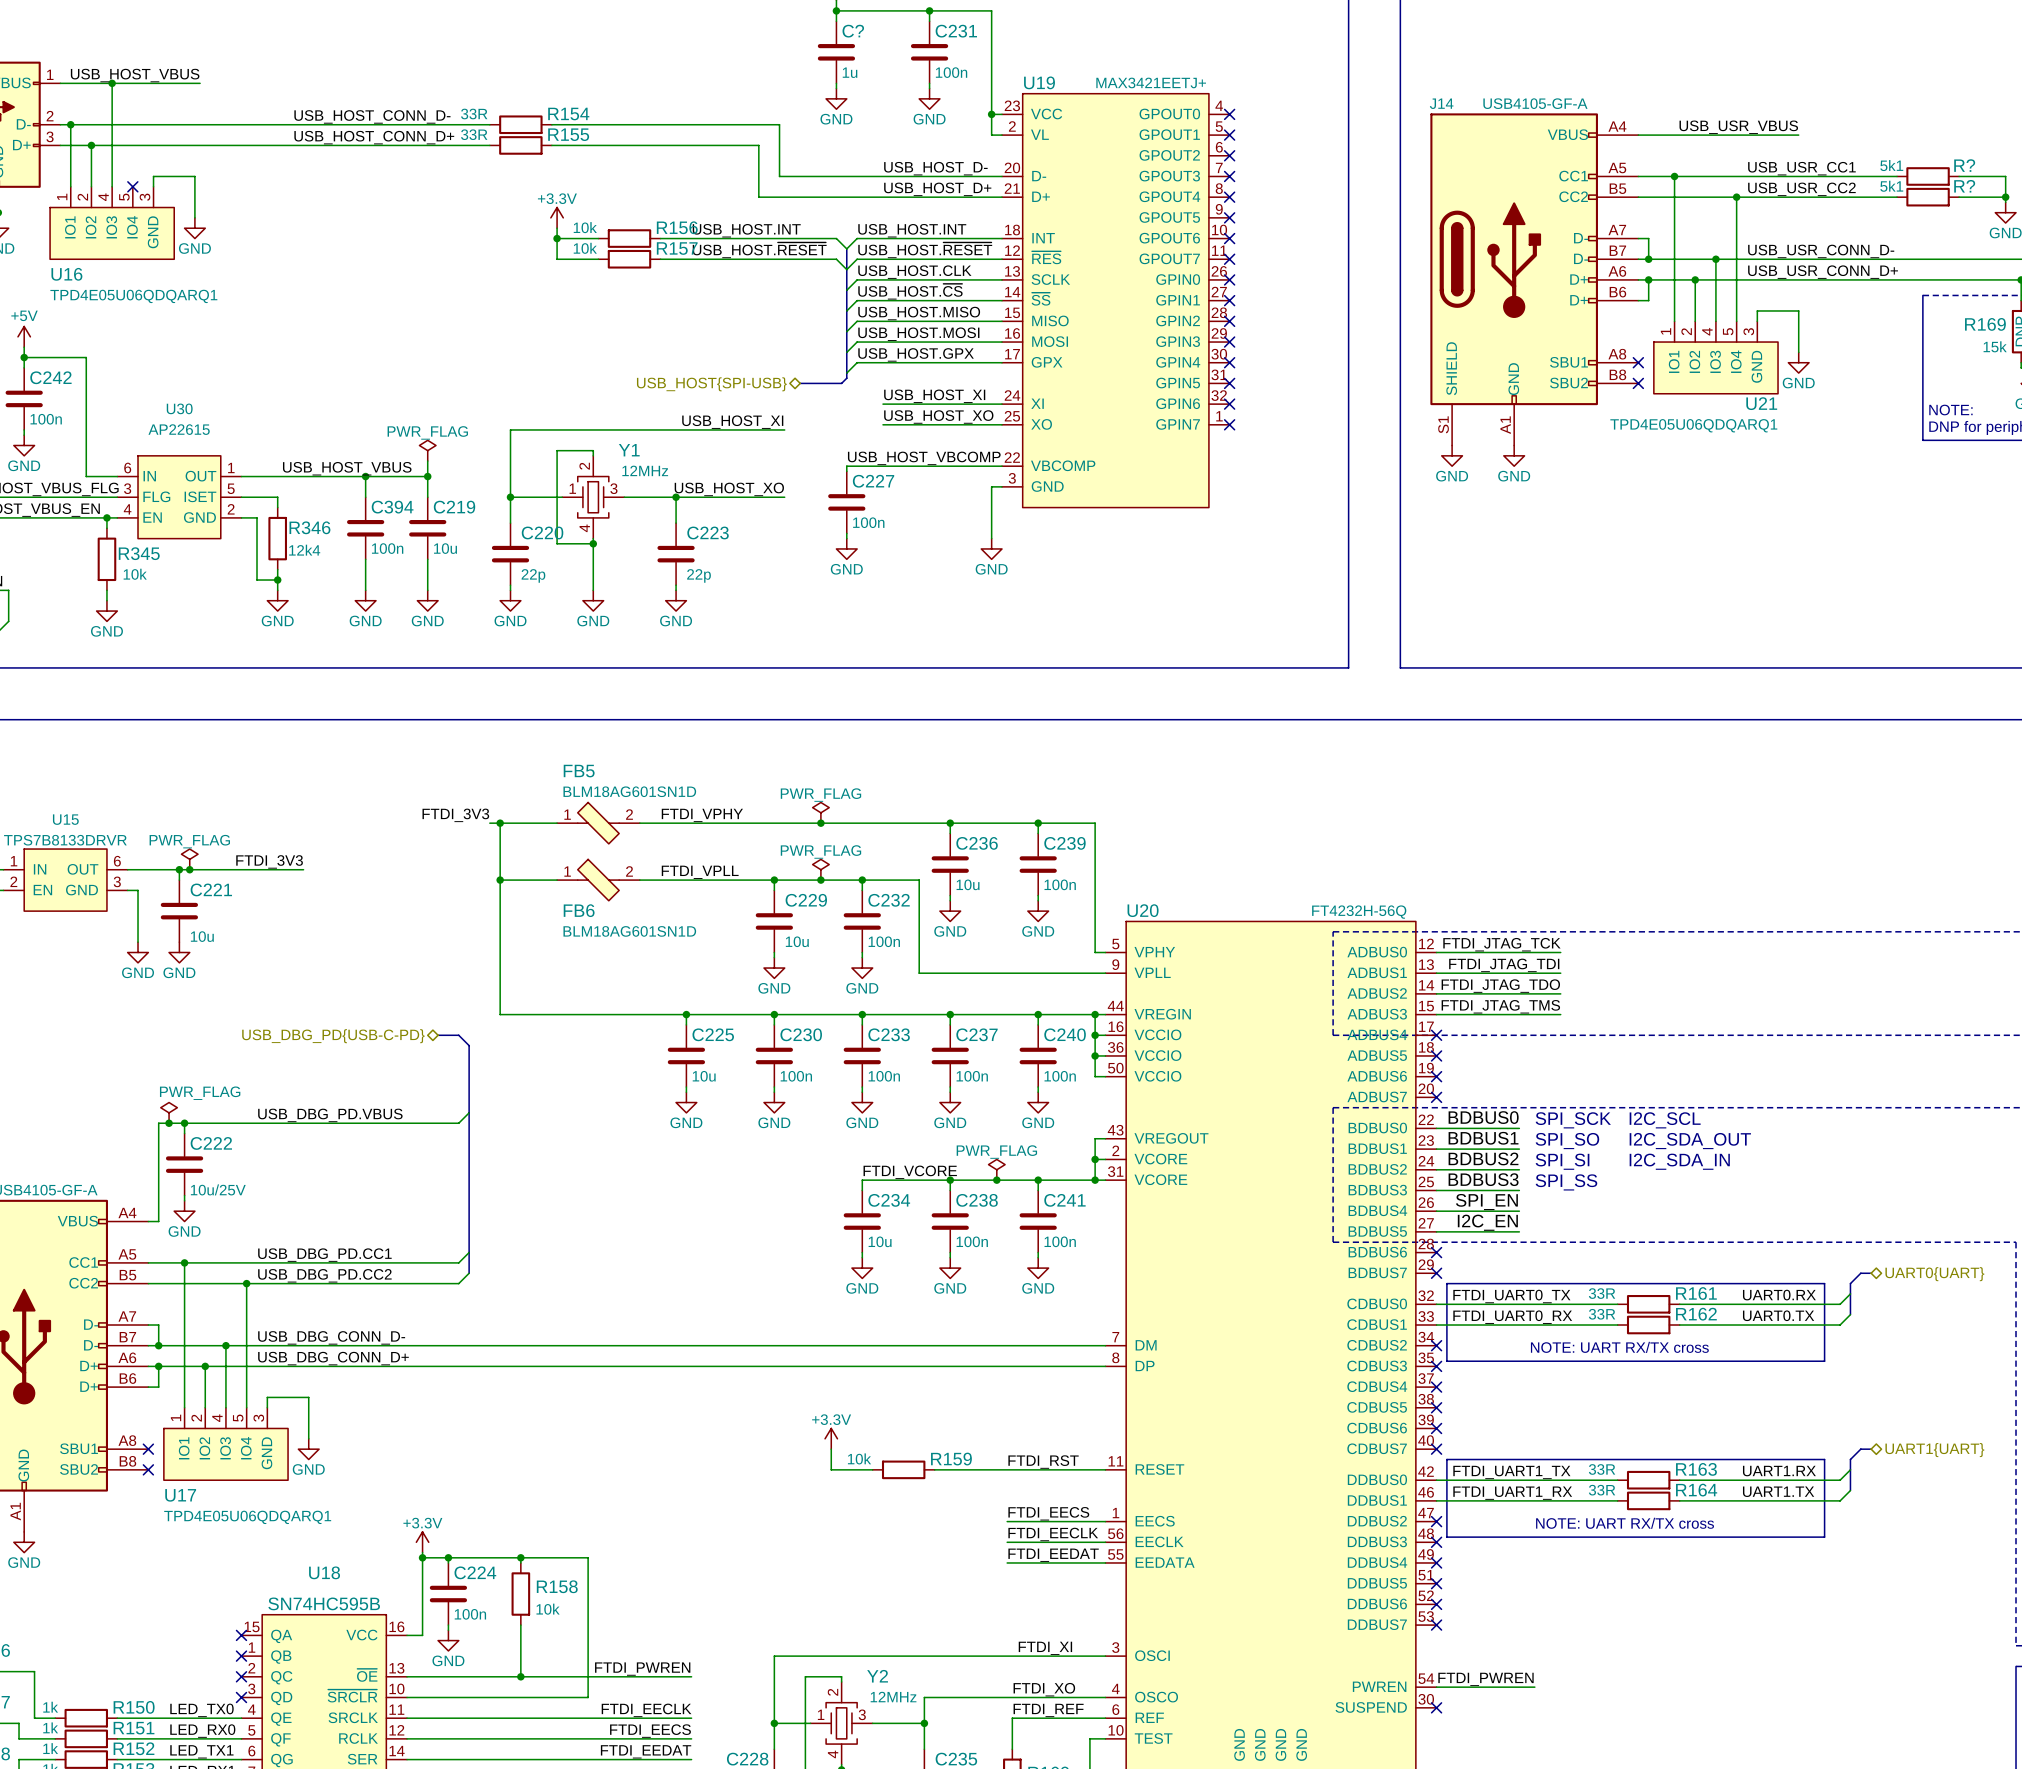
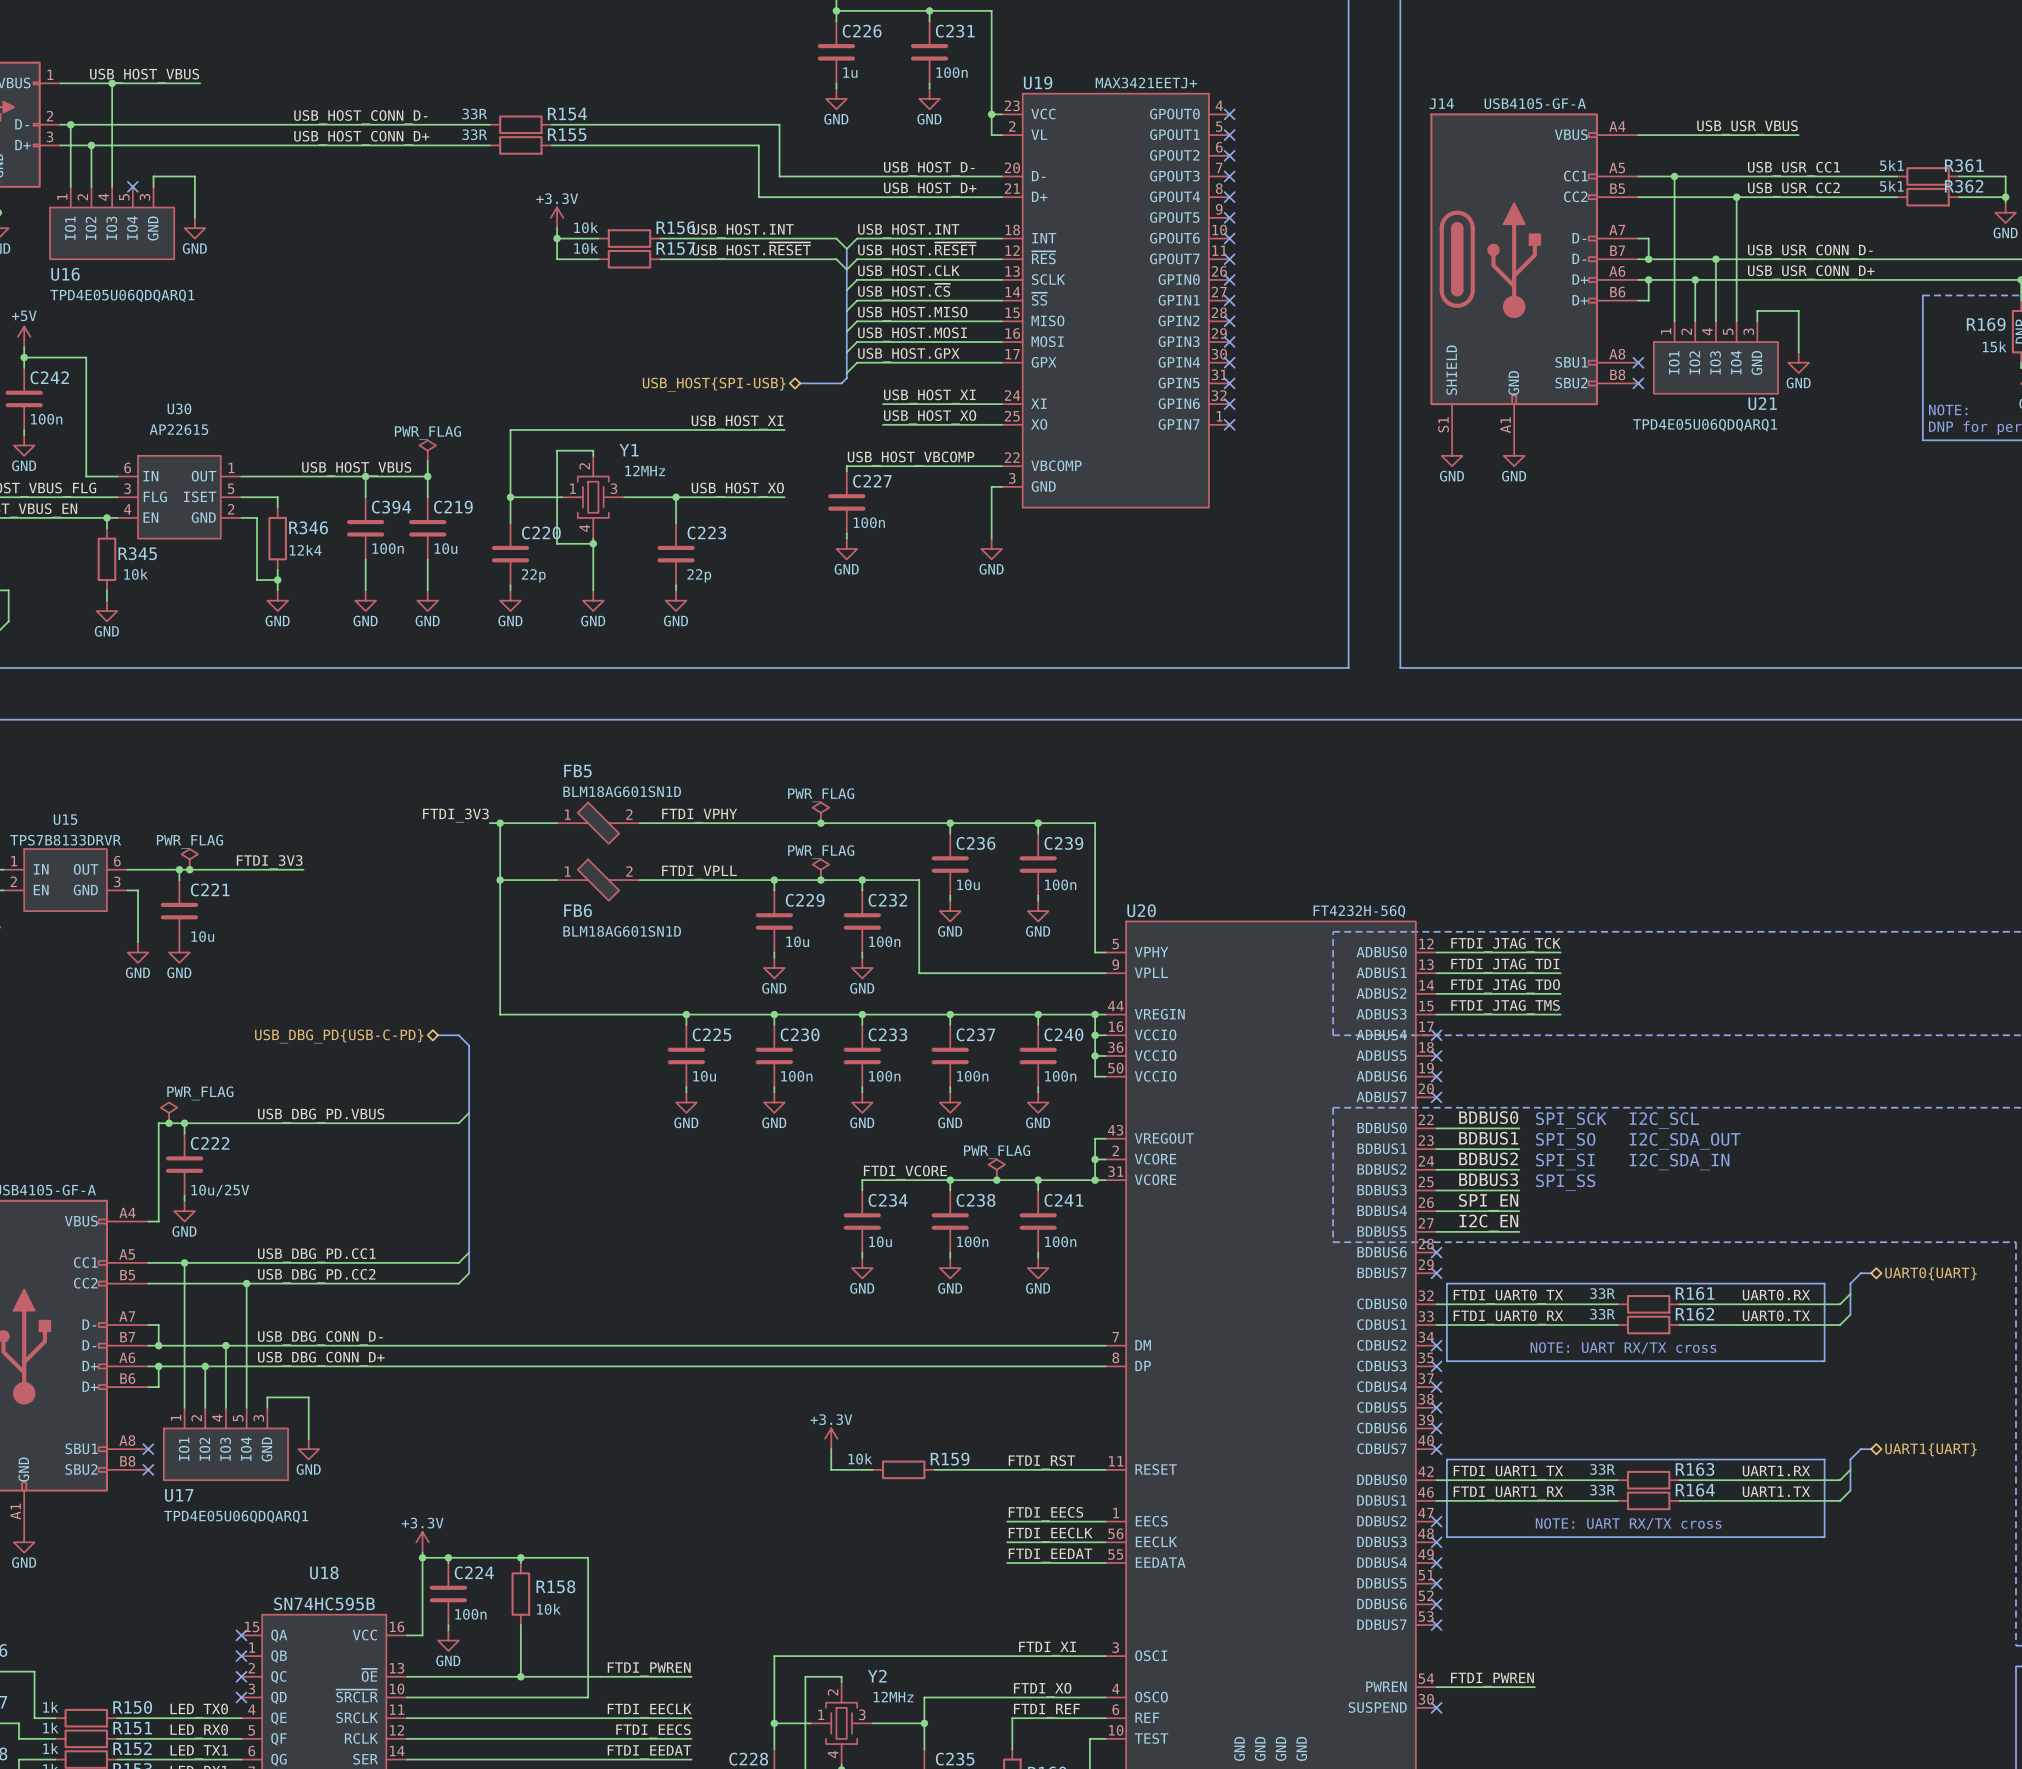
C? name: C? (853, 31) -> C226 (862, 31)
R? name: R? (1964, 165) -> R361 (1964, 165)
R? name: R? (1964, 186) -> R362 (1964, 186)

